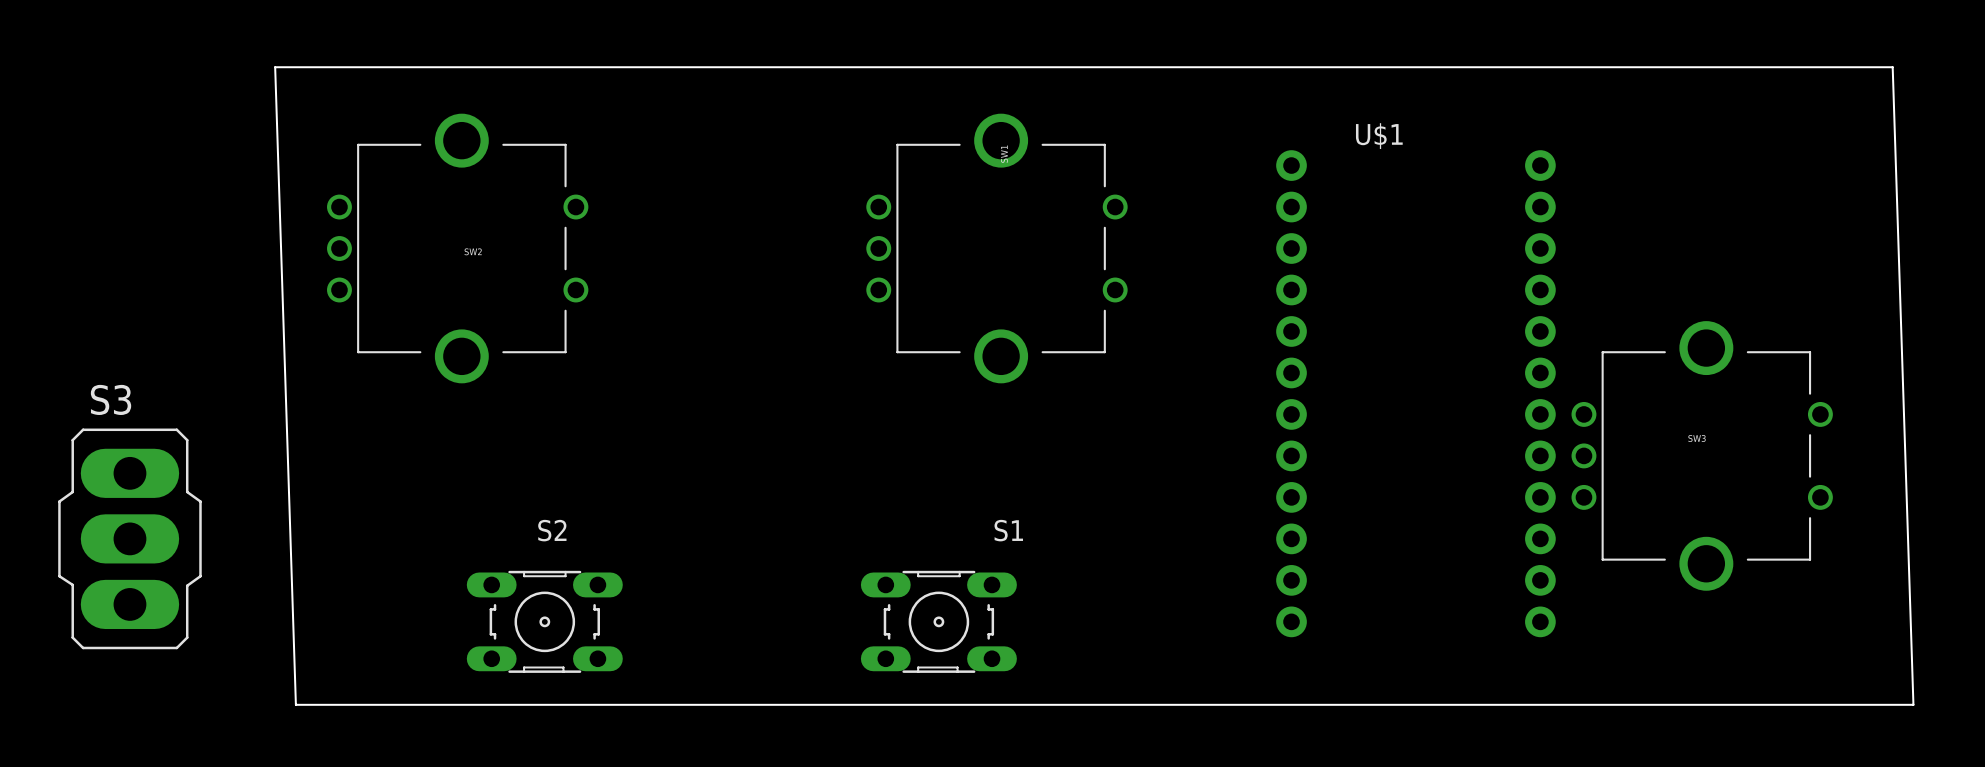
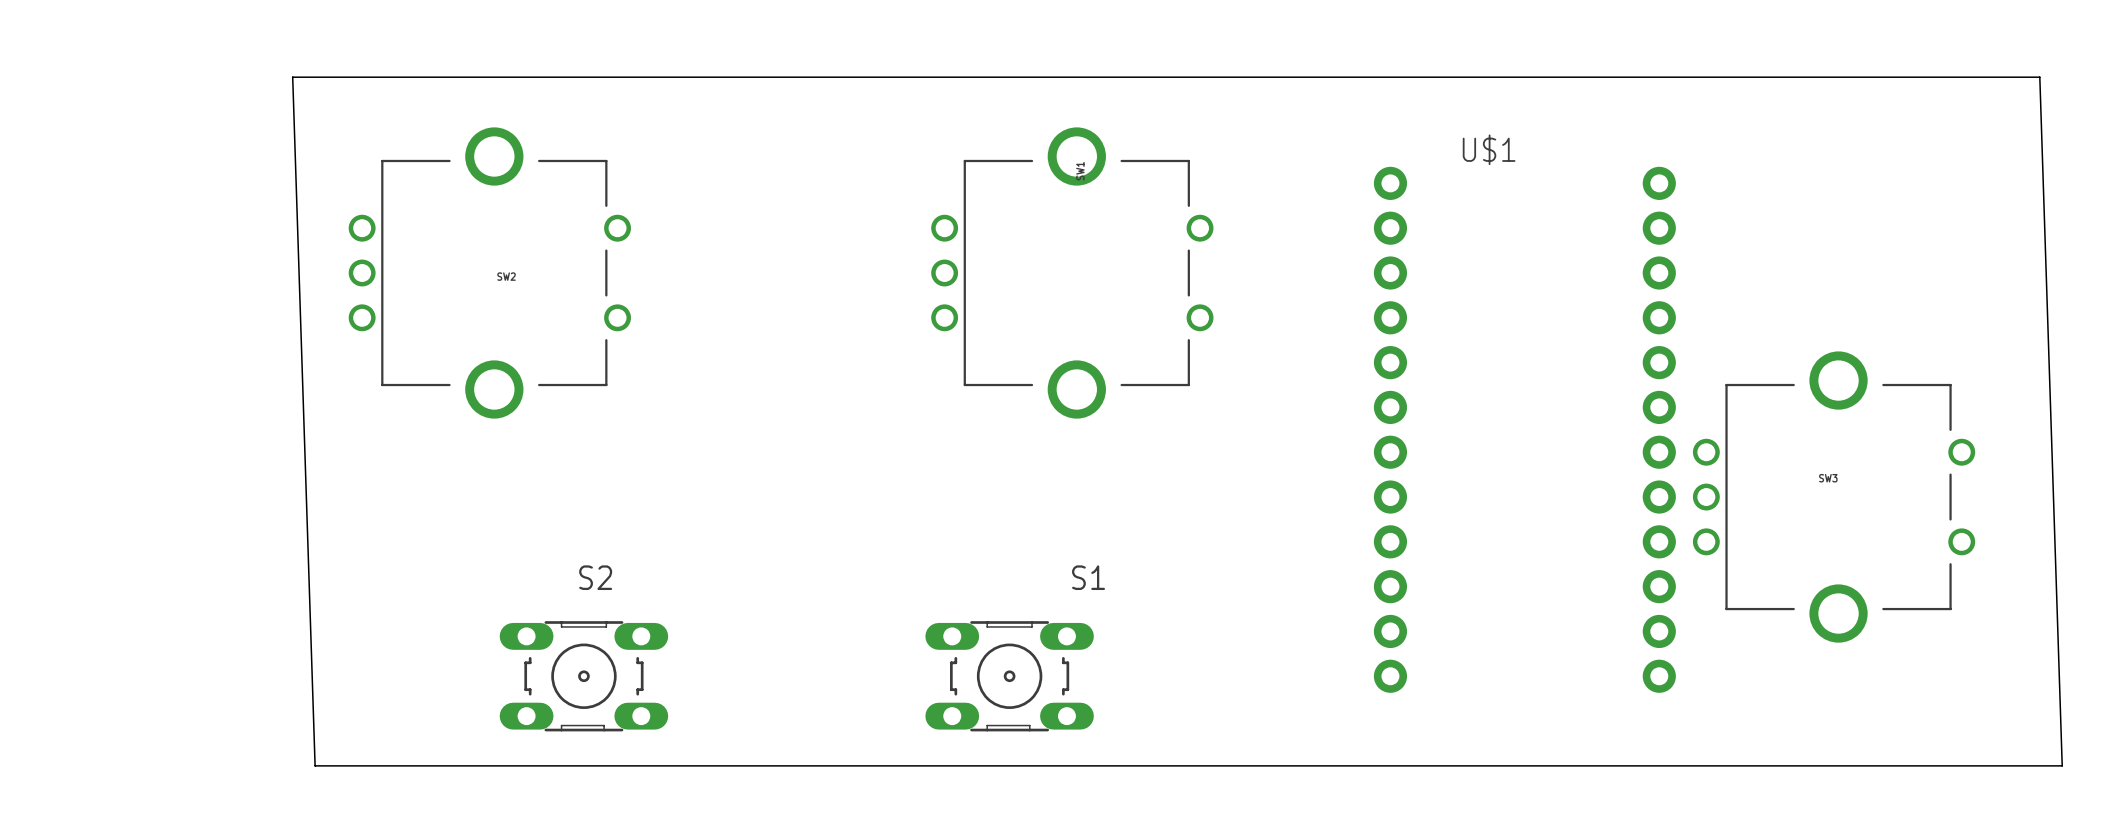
S3: (129, 538) -> none

